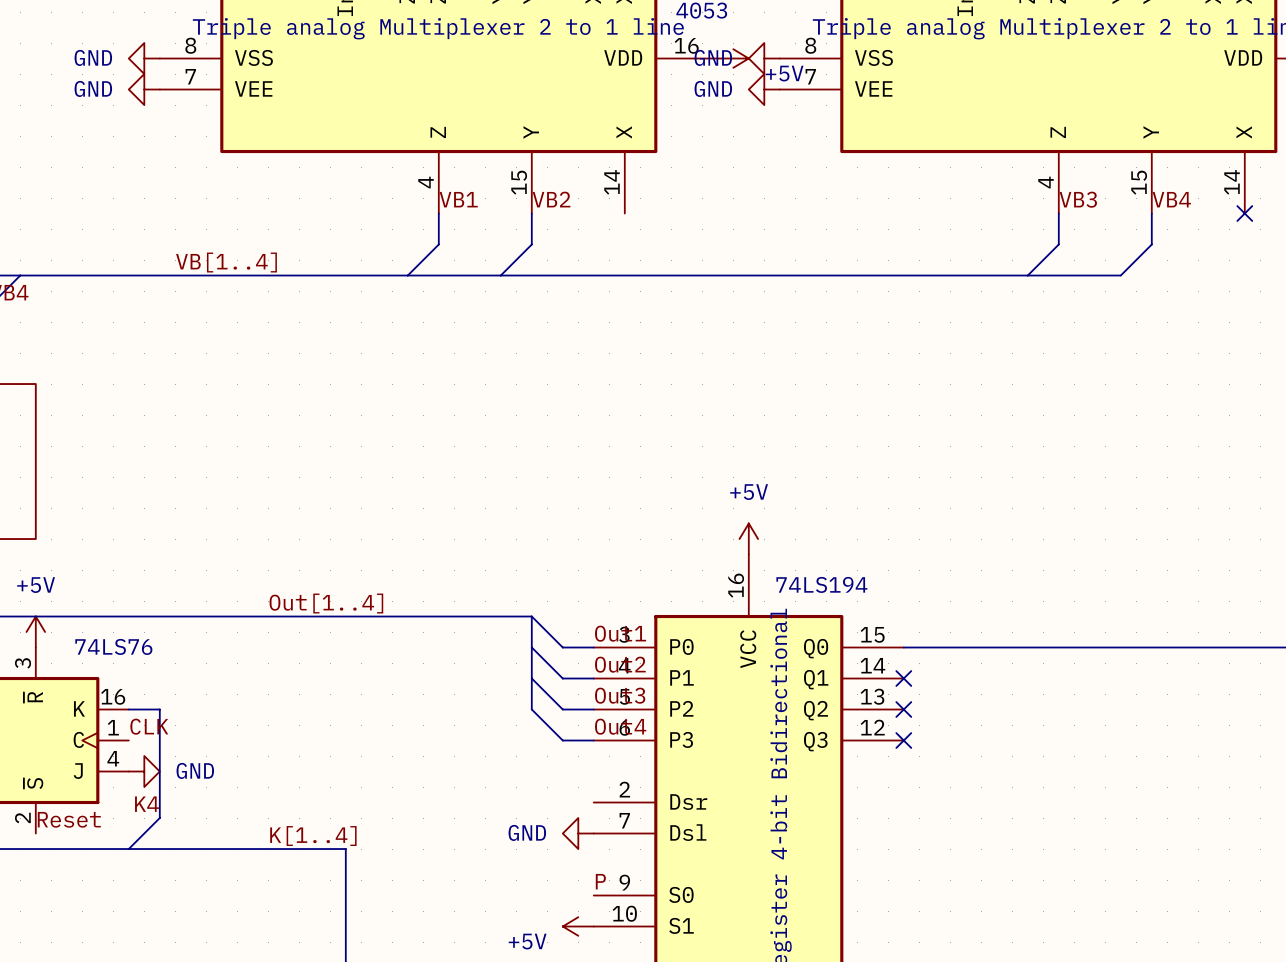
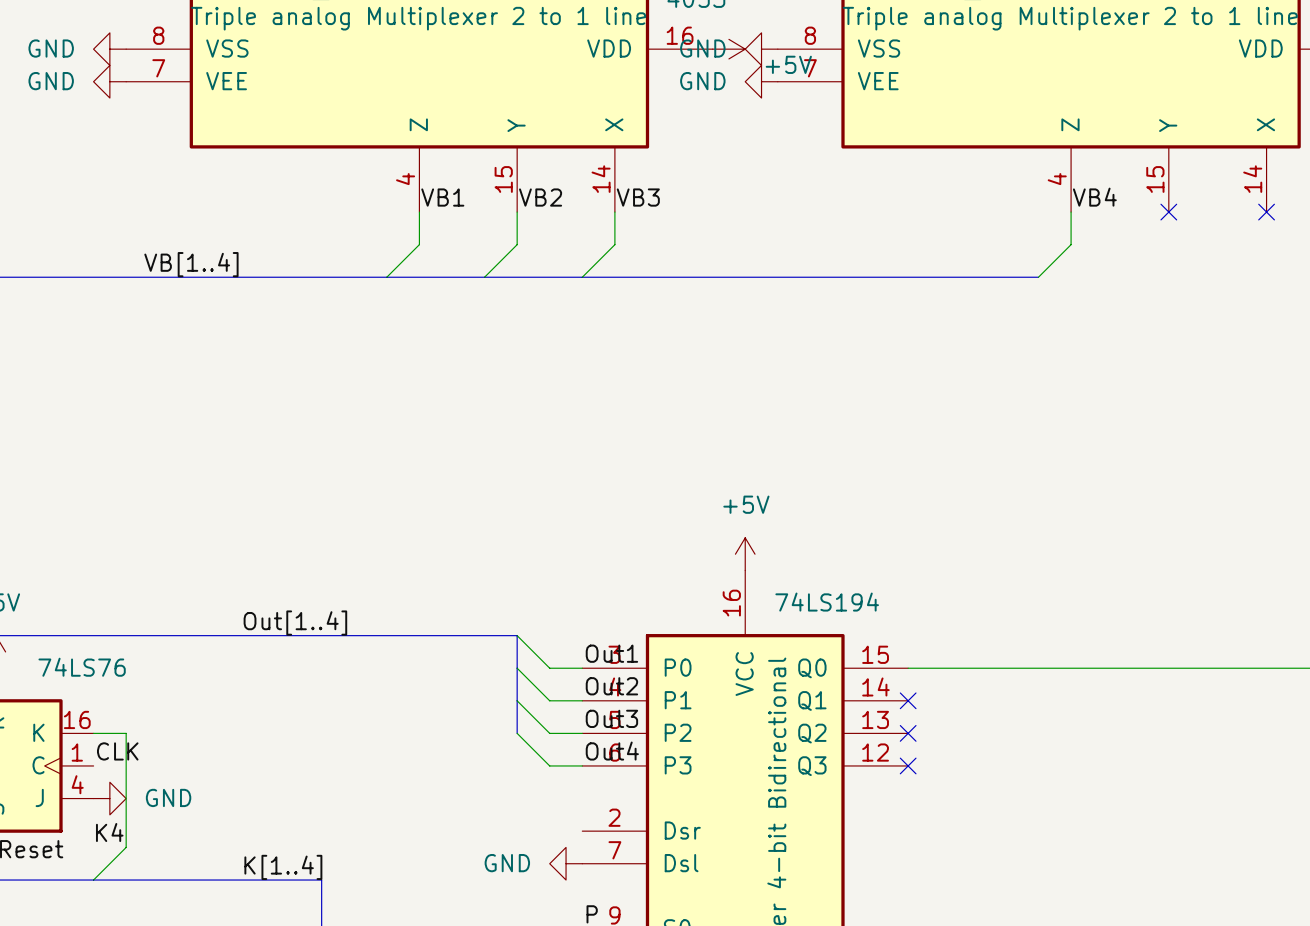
label: none -> VB3 (638, 197)
label: VB3 (1078, 199) -> VB4 (1094, 197)
label: VB4 (1171, 199) -> none
wire: none -> (614, 212) (614, 244) (582, 277)
wire: (1151, 213) (1151, 244) (1120, 275) -> none
no-connect mark: none -> (1168, 212)
bus: (1027, 275) (1120, 275) -> none

